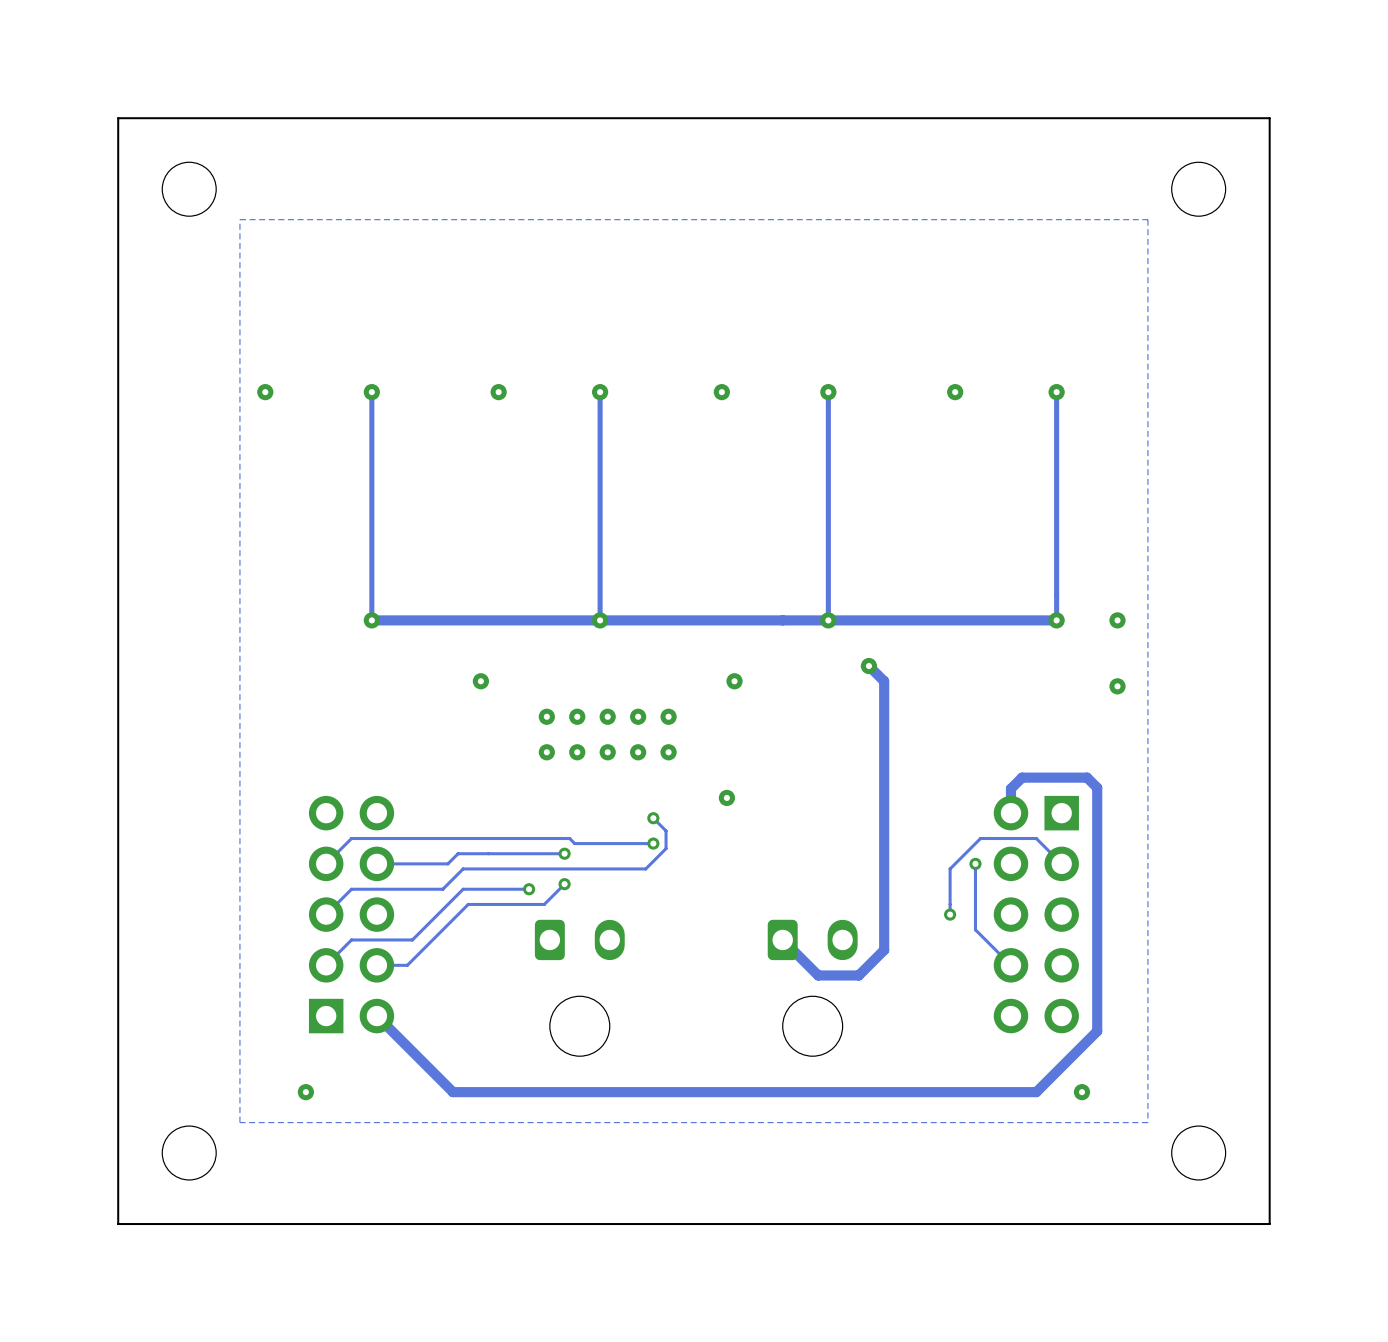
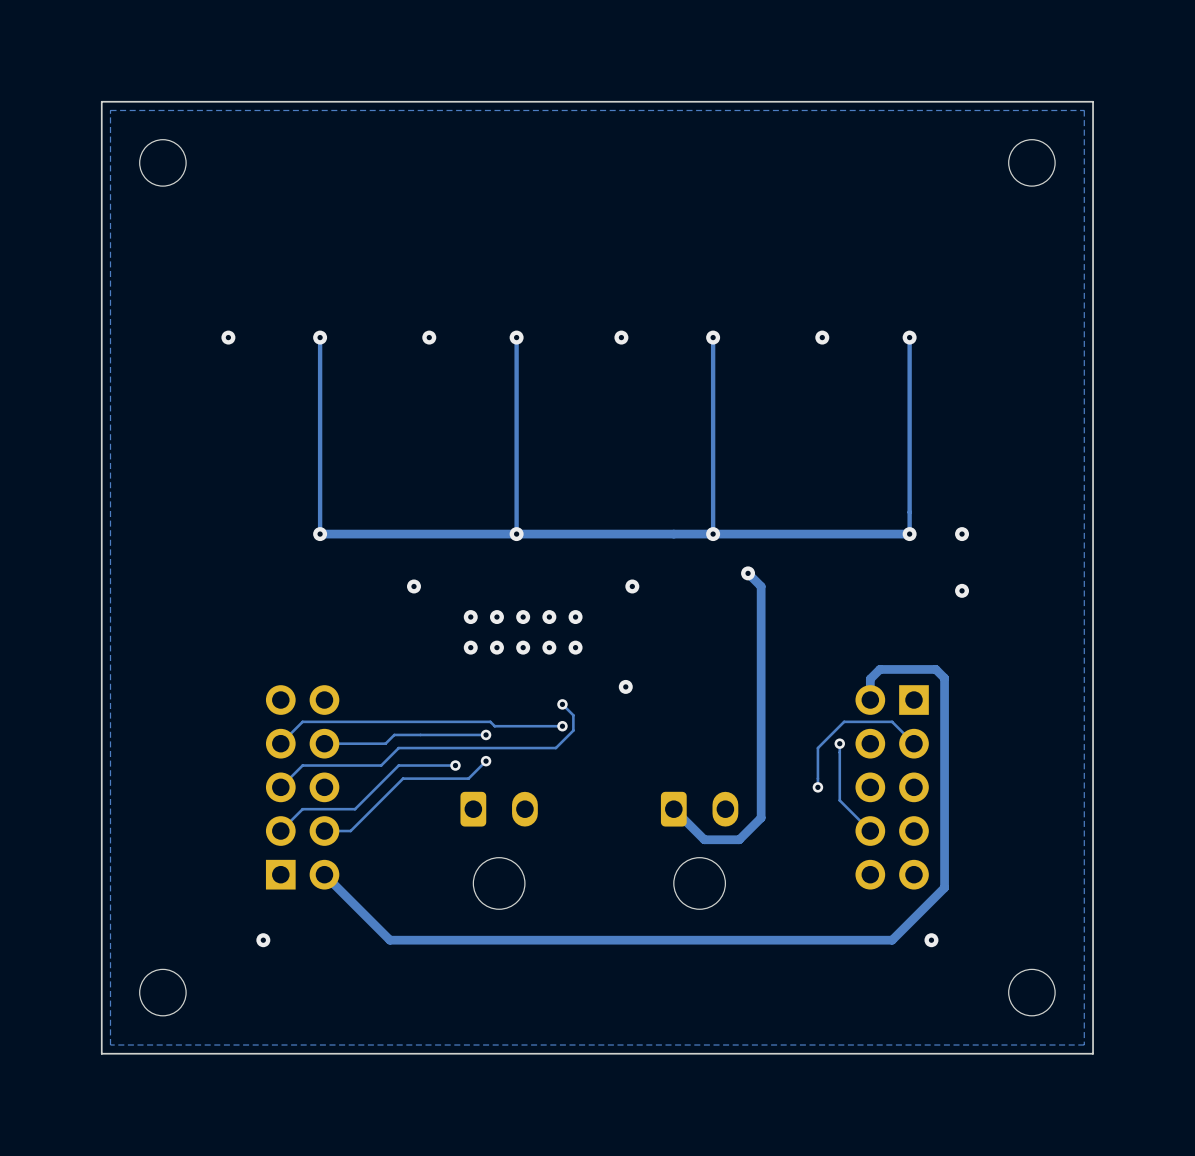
zone outline: (1147, 219) (1147, 1122) (239, 1122) (239, 219) (1147, 219) -> (1084, 110) (1084, 1045) (110, 1045) (110, 110) (1084, 110)

